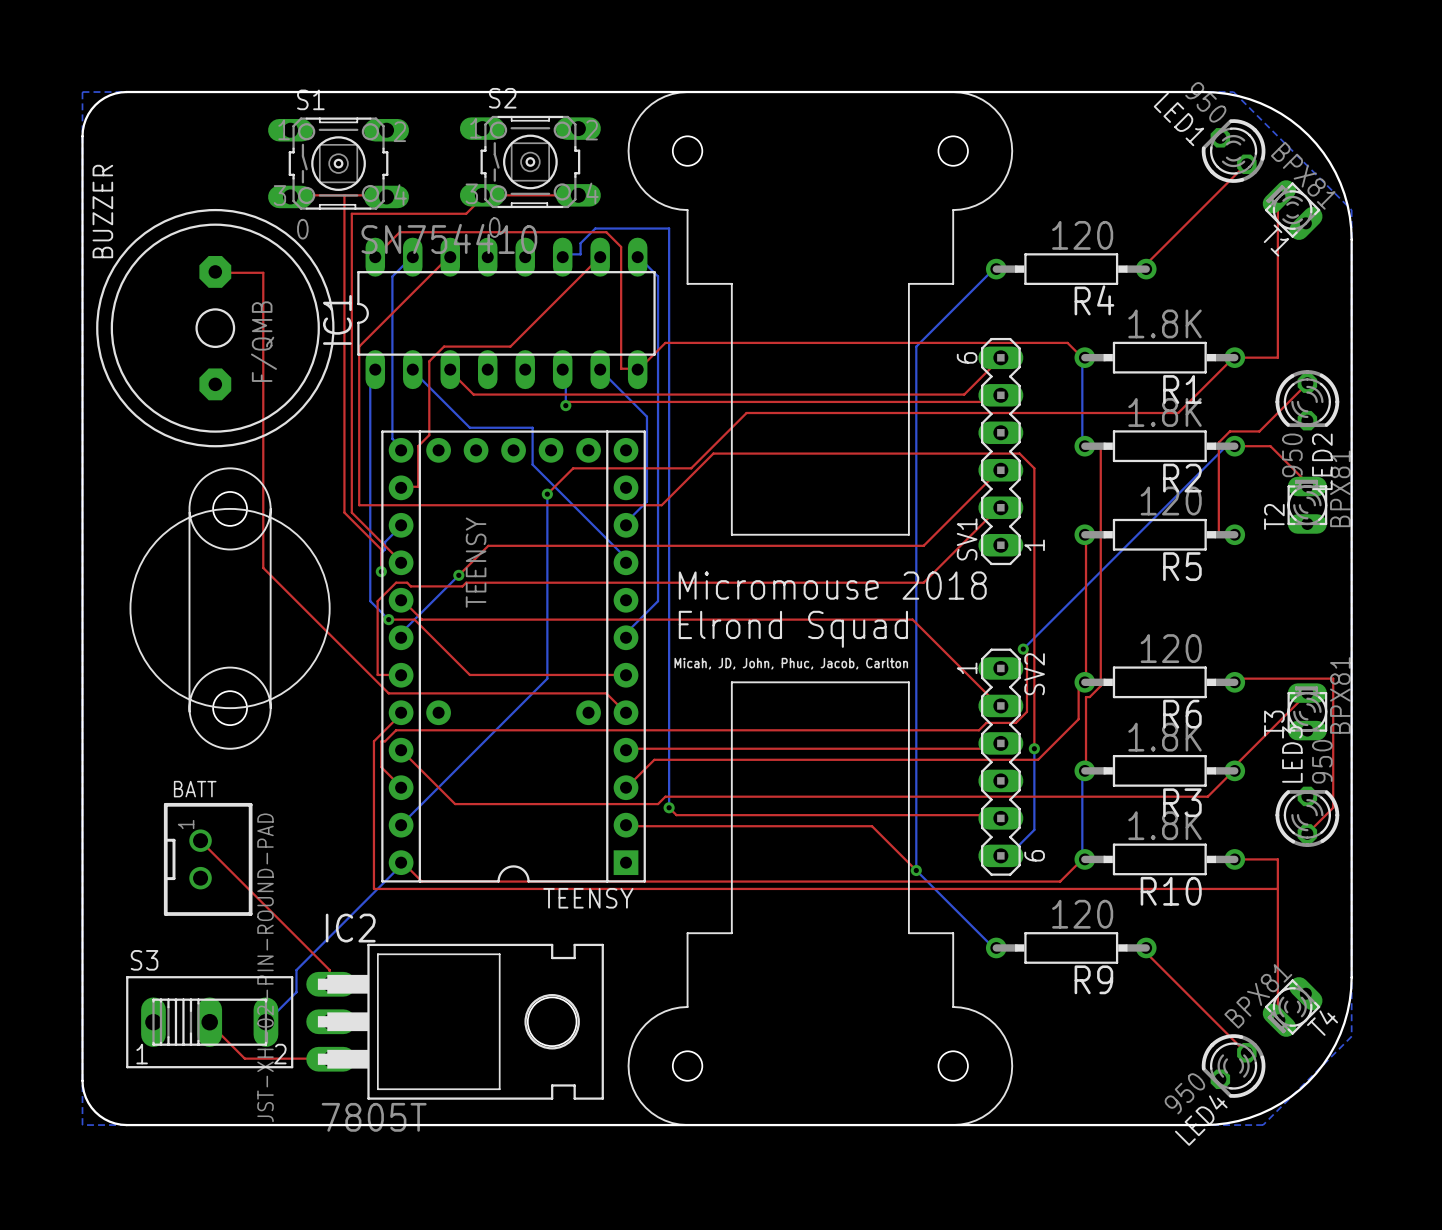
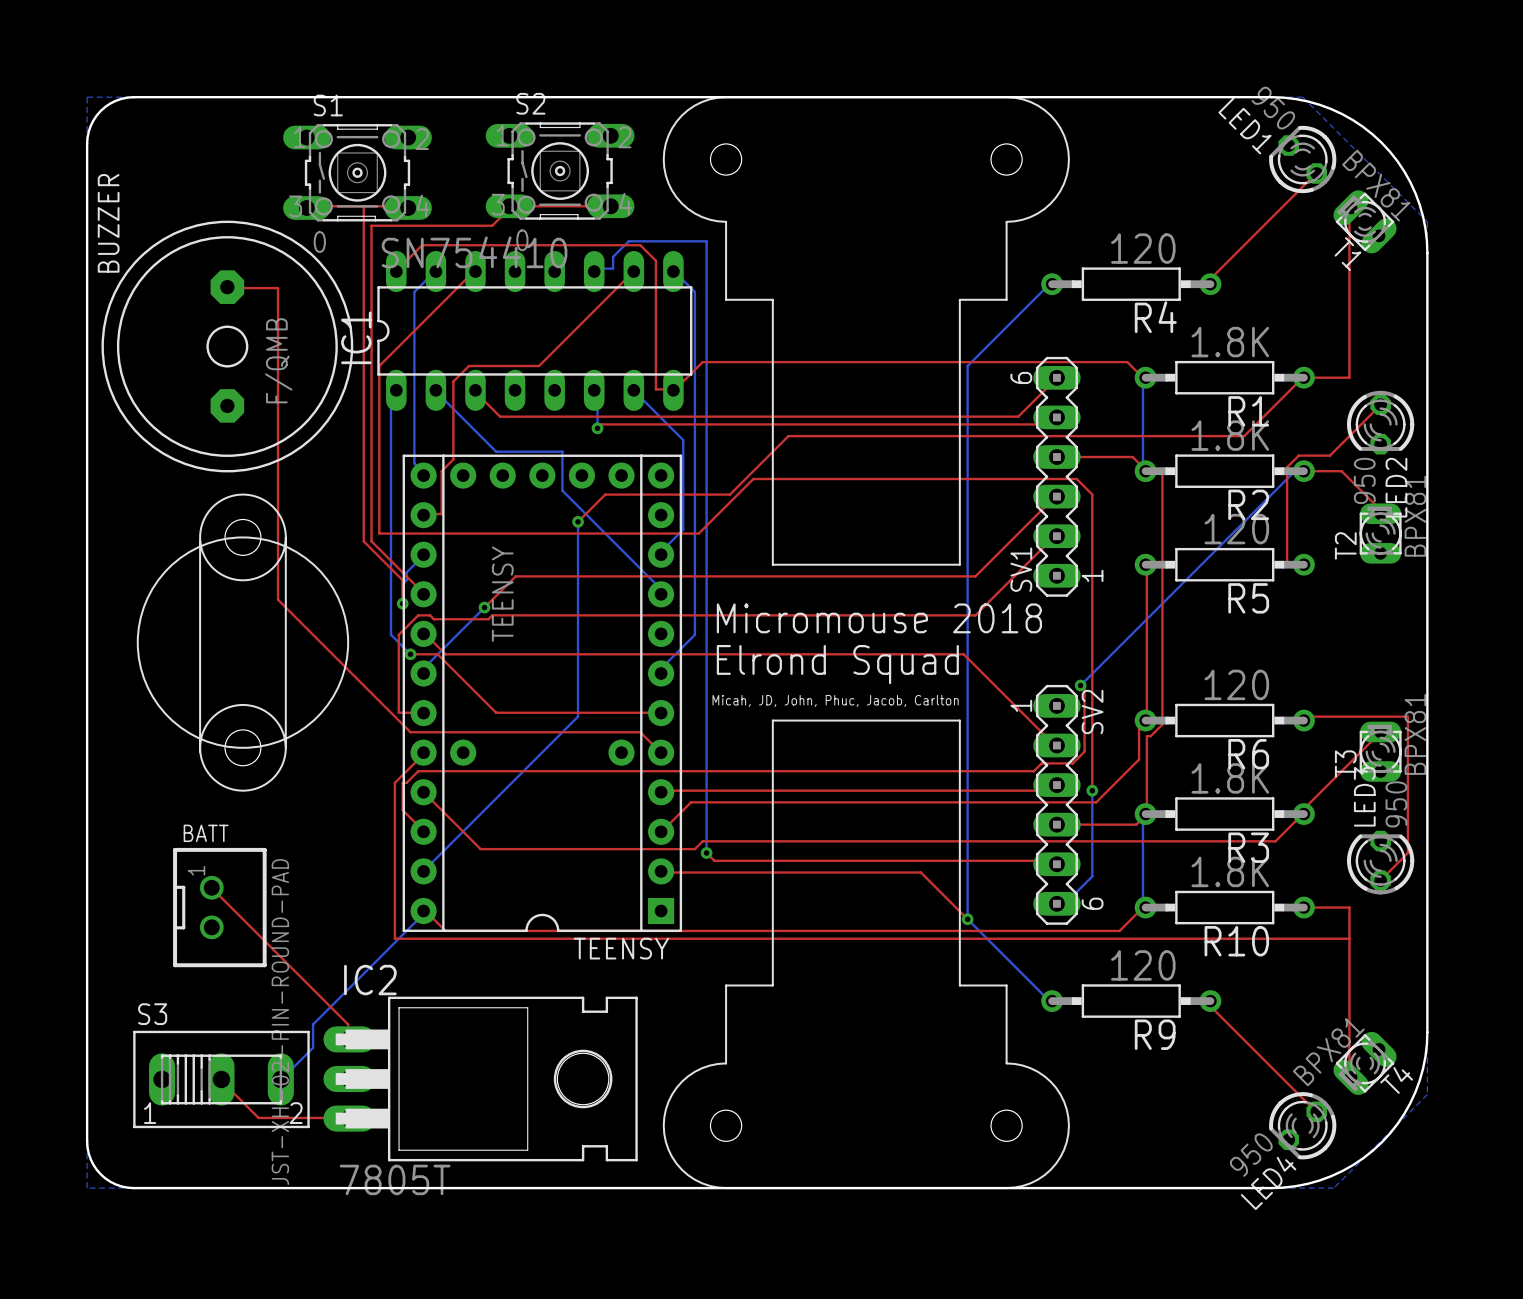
top track: none -> (1056, 457) (1132, 457) (1146, 471)
top track: none -> (1146, 814) (1136, 824) (1056, 824)

